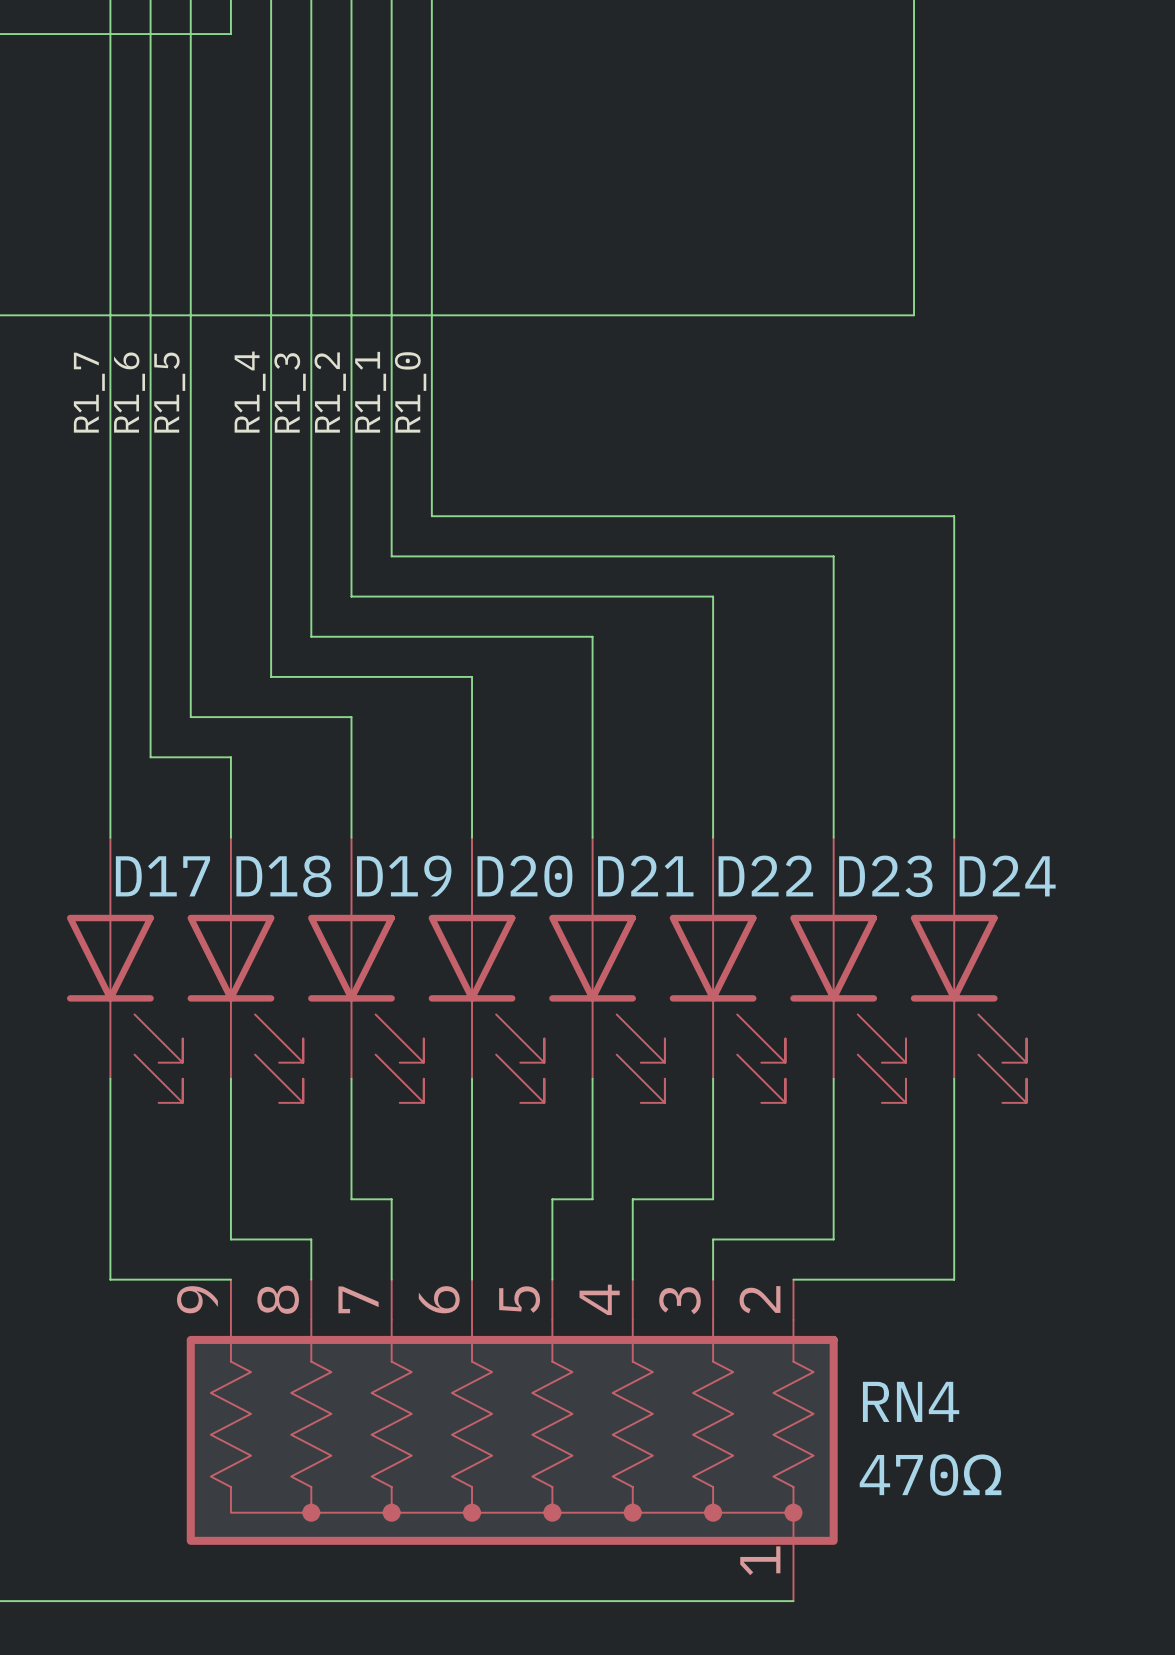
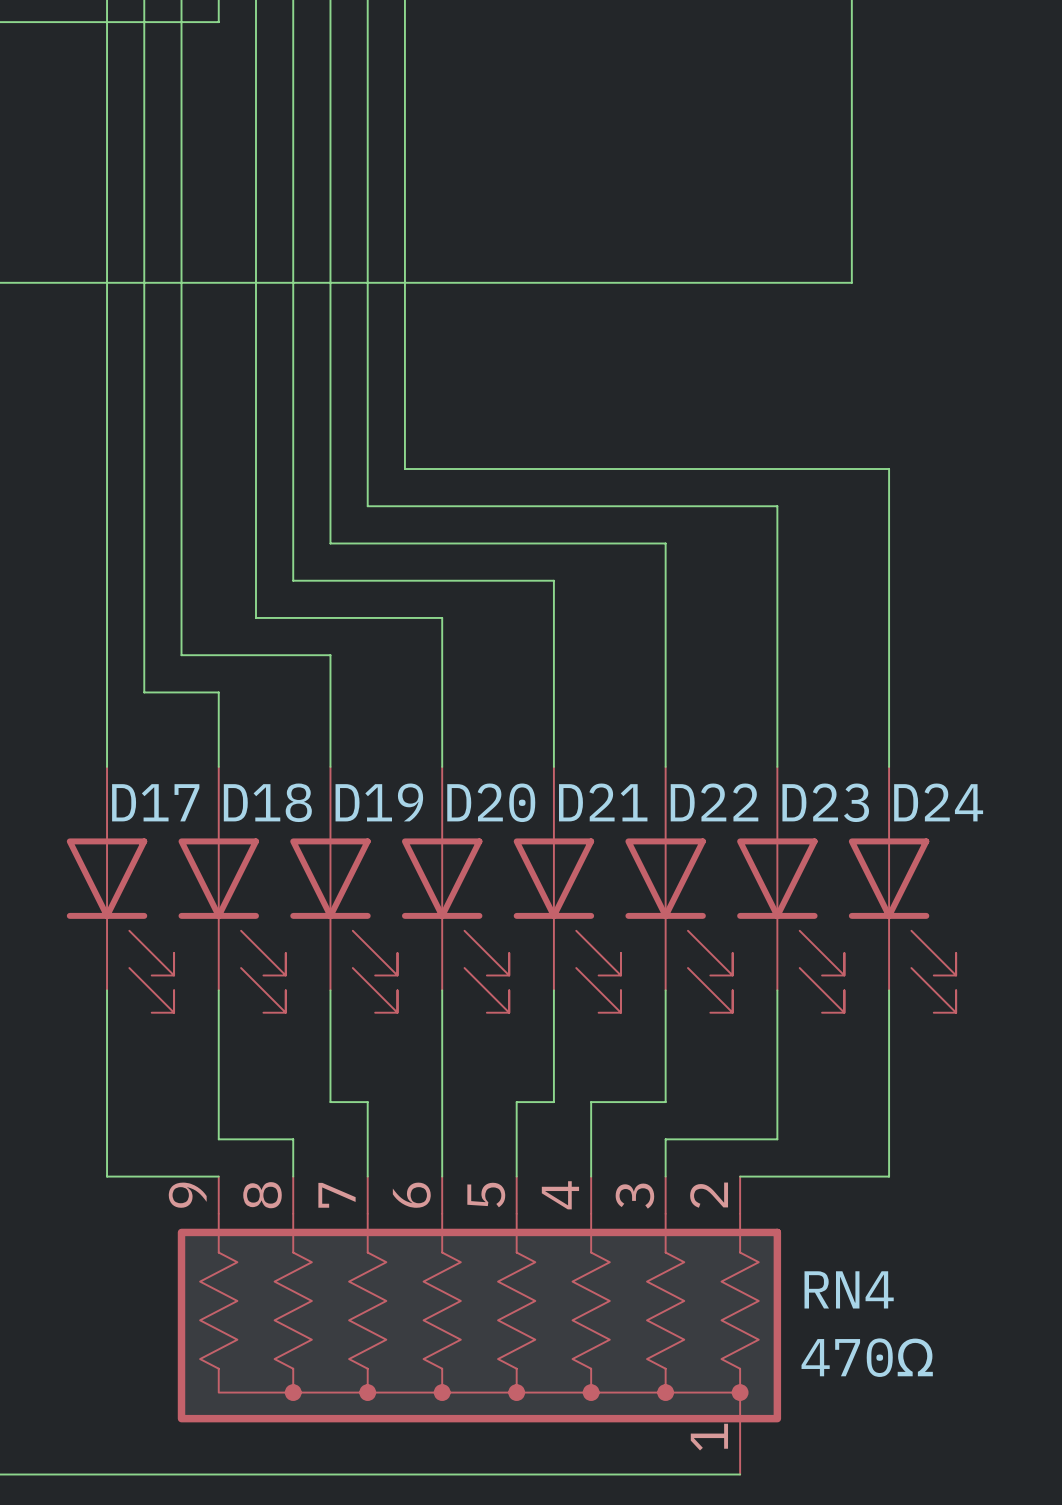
label: R1_7 (89, 392) -> none
label: R1_6 (129, 392) -> none
label: R1_5 (169, 392) -> none
label: R1_4 (250, 392) -> none
label: R1_3 (290, 392) -> none
label: R1_2 (330, 392) -> none
label: R1_1 (370, 392) -> none
label: R1_0 (410, 392) -> none

